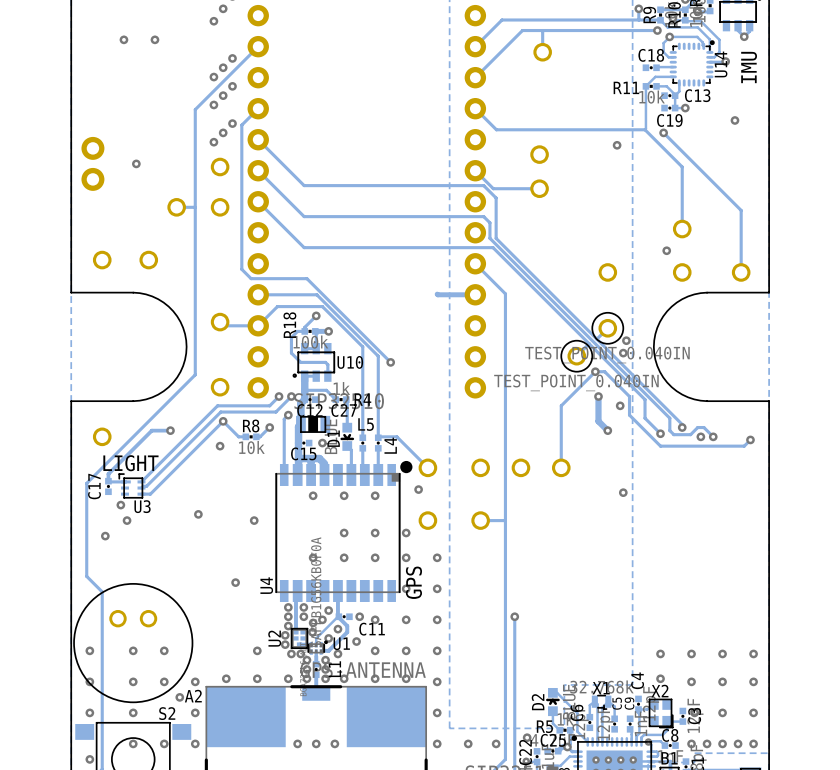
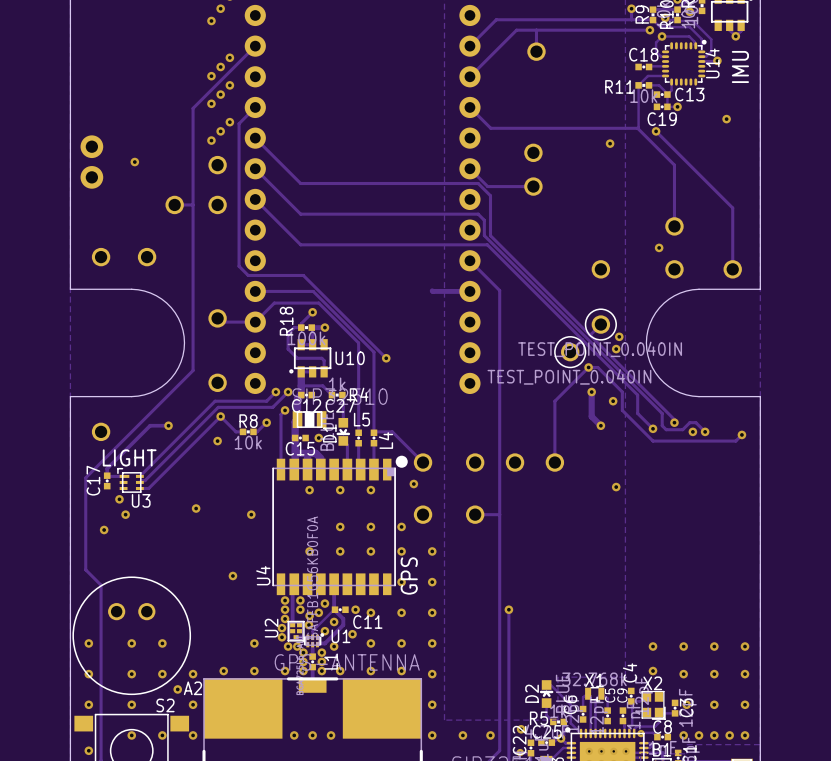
via: (123, 39) -> none
via: (154, 39) -> none

